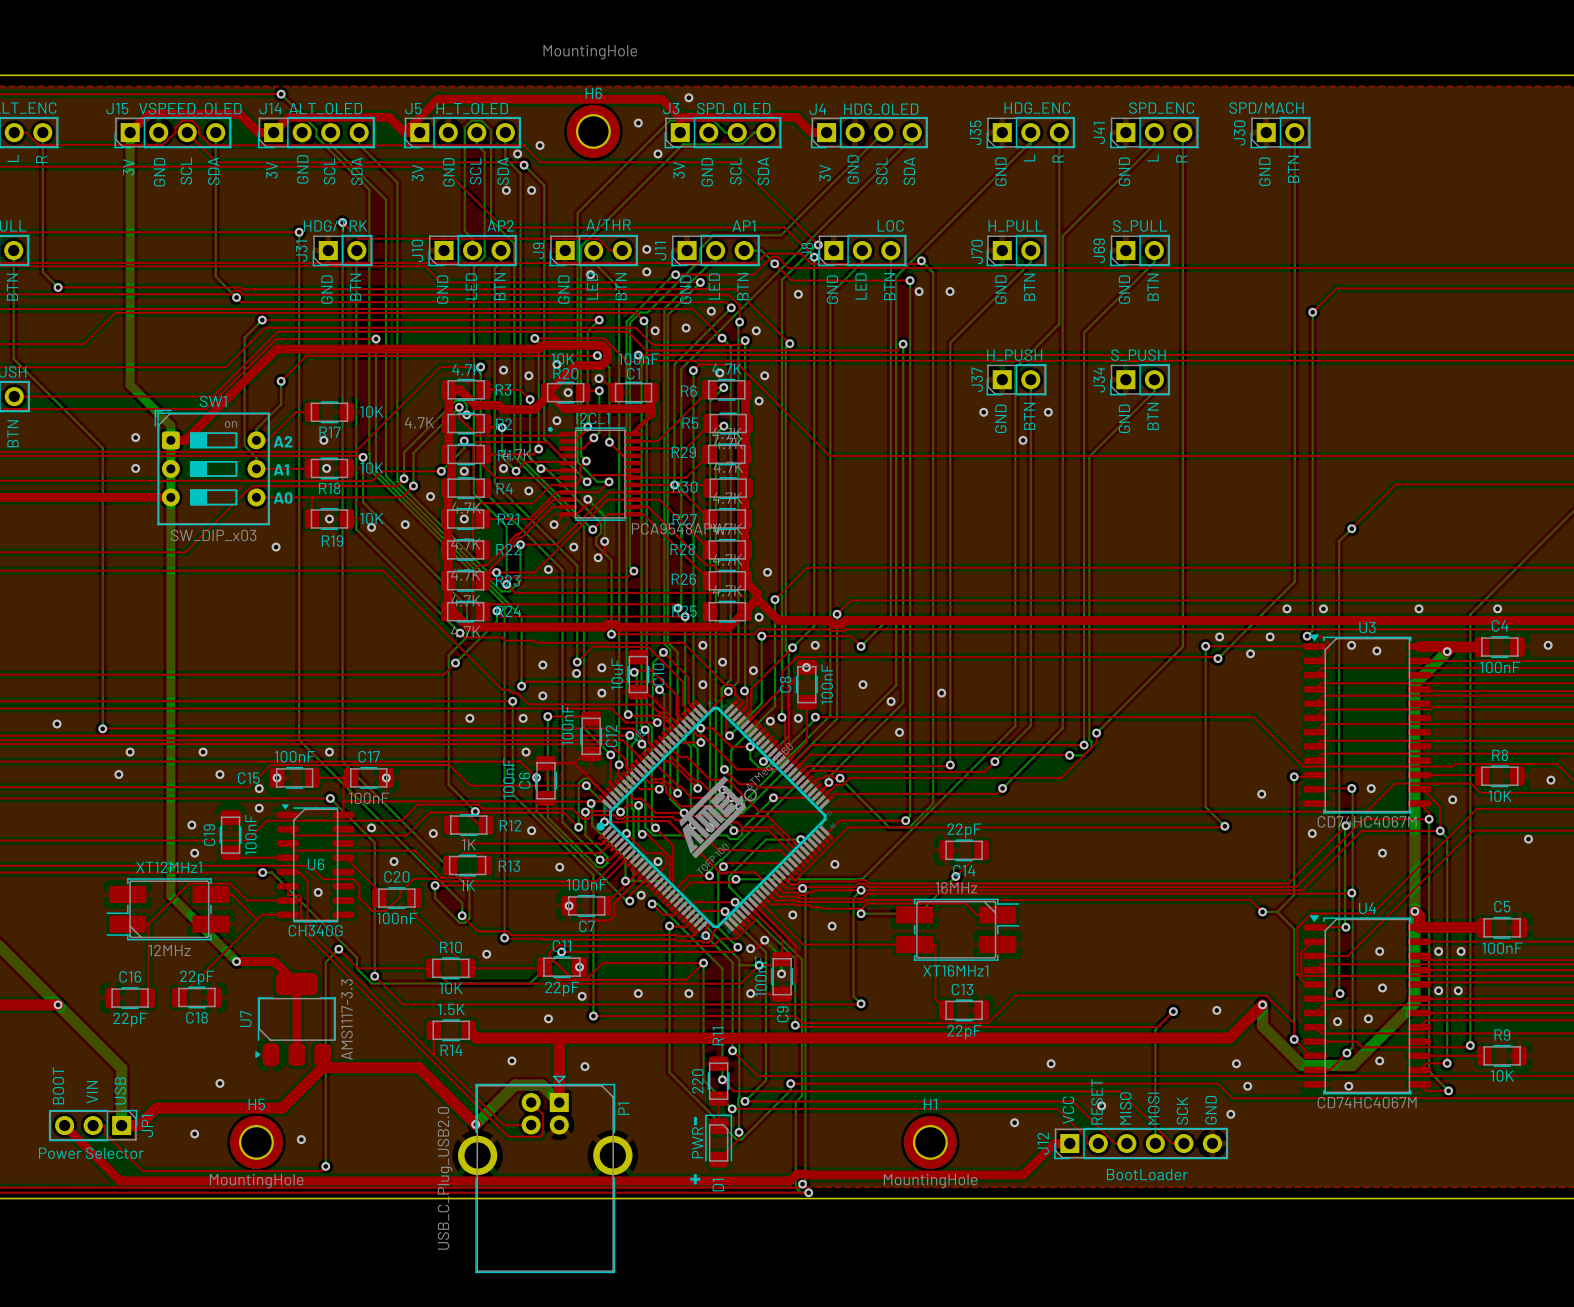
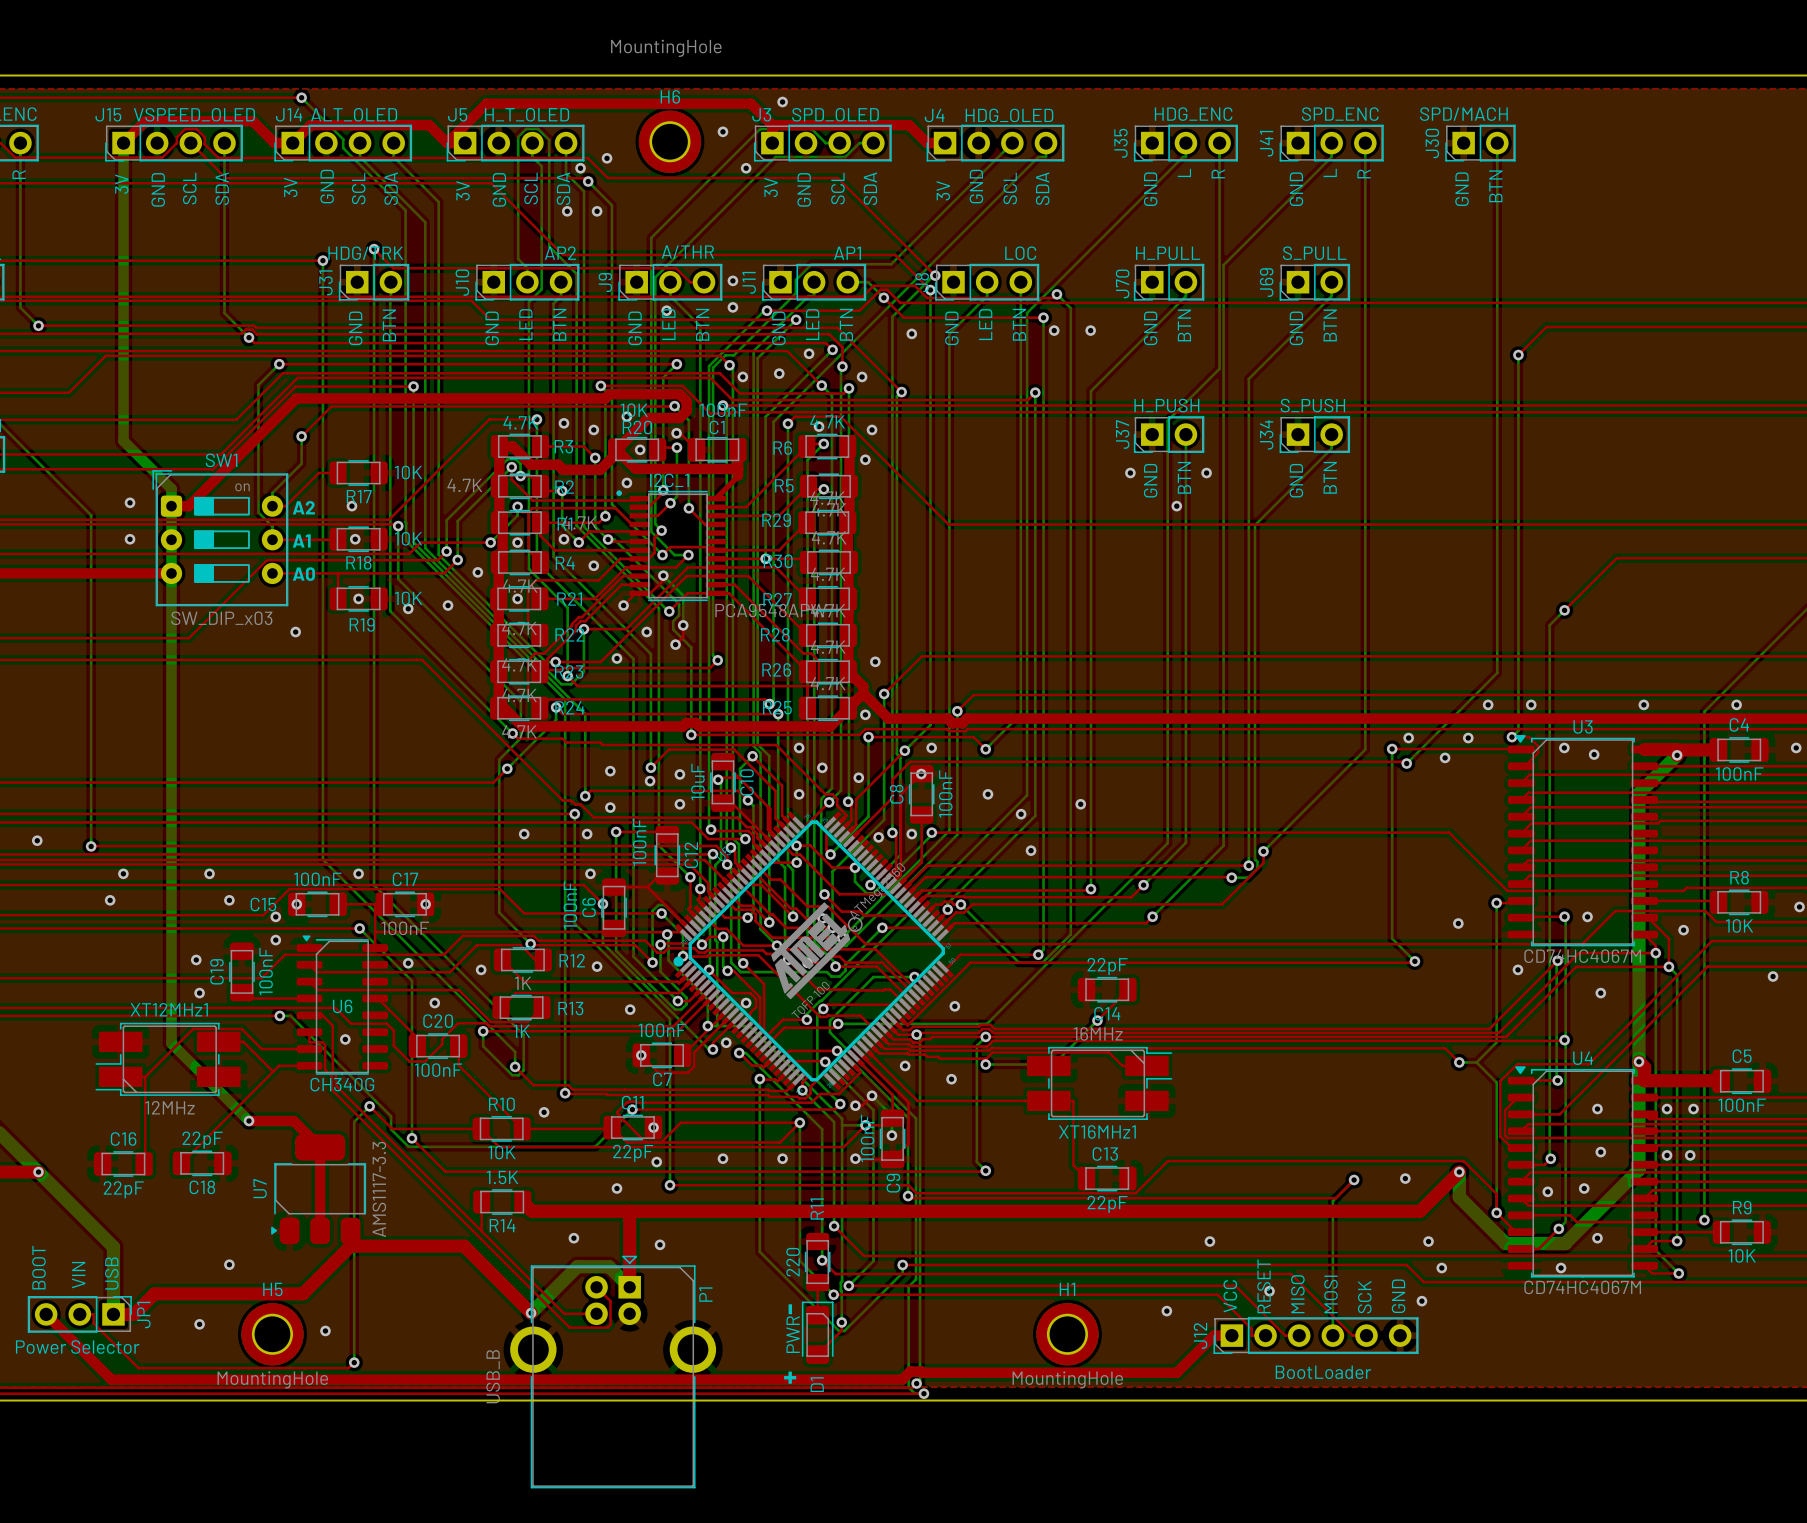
P1 value: USB_C_Plug_USB2.0 (445, 1178) -> USB_B (493, 1376)

